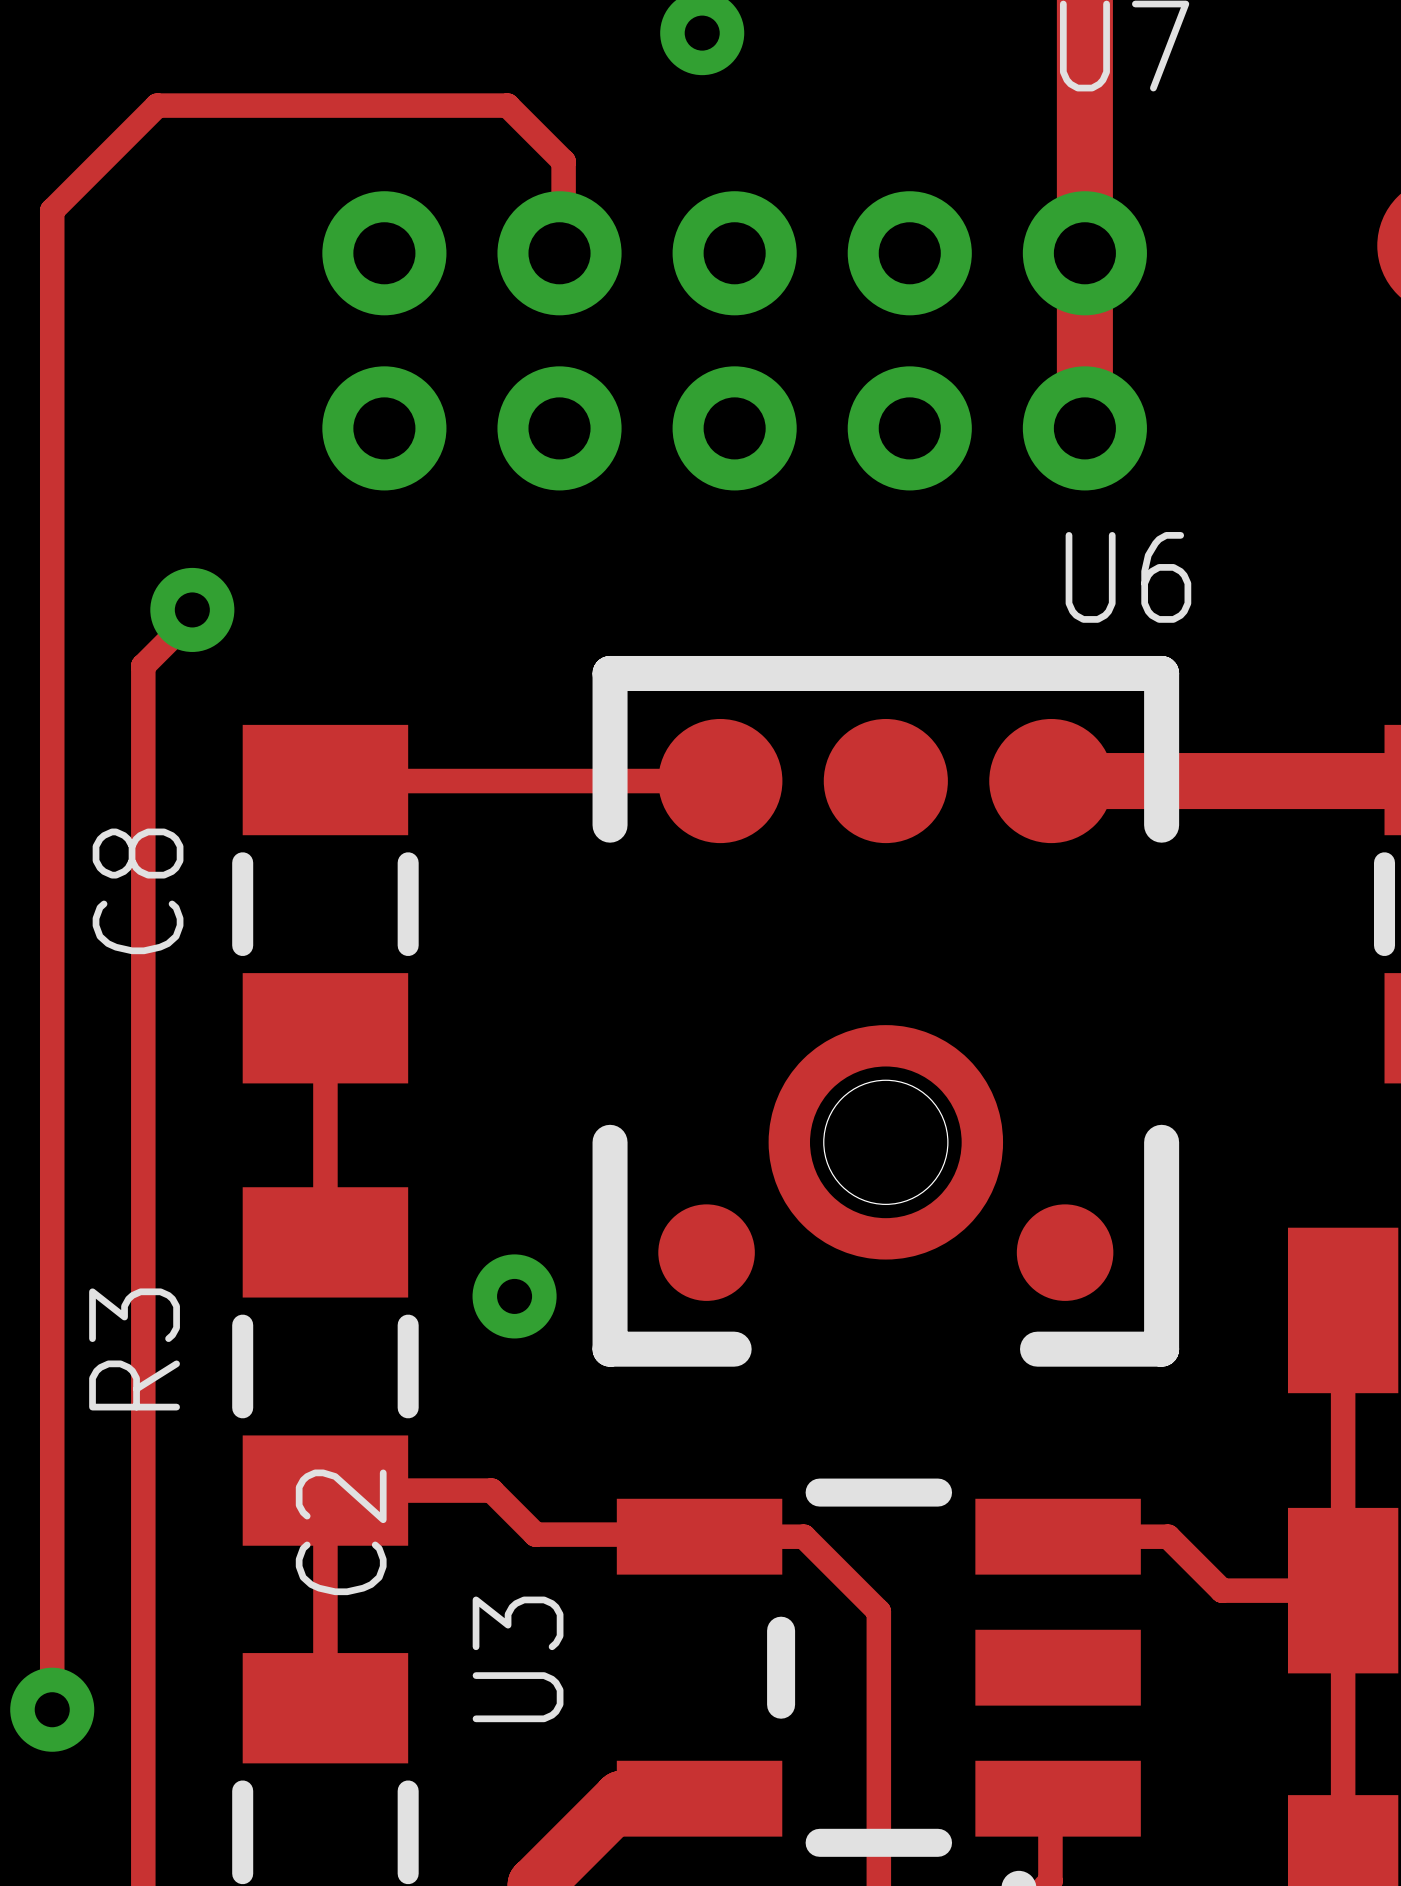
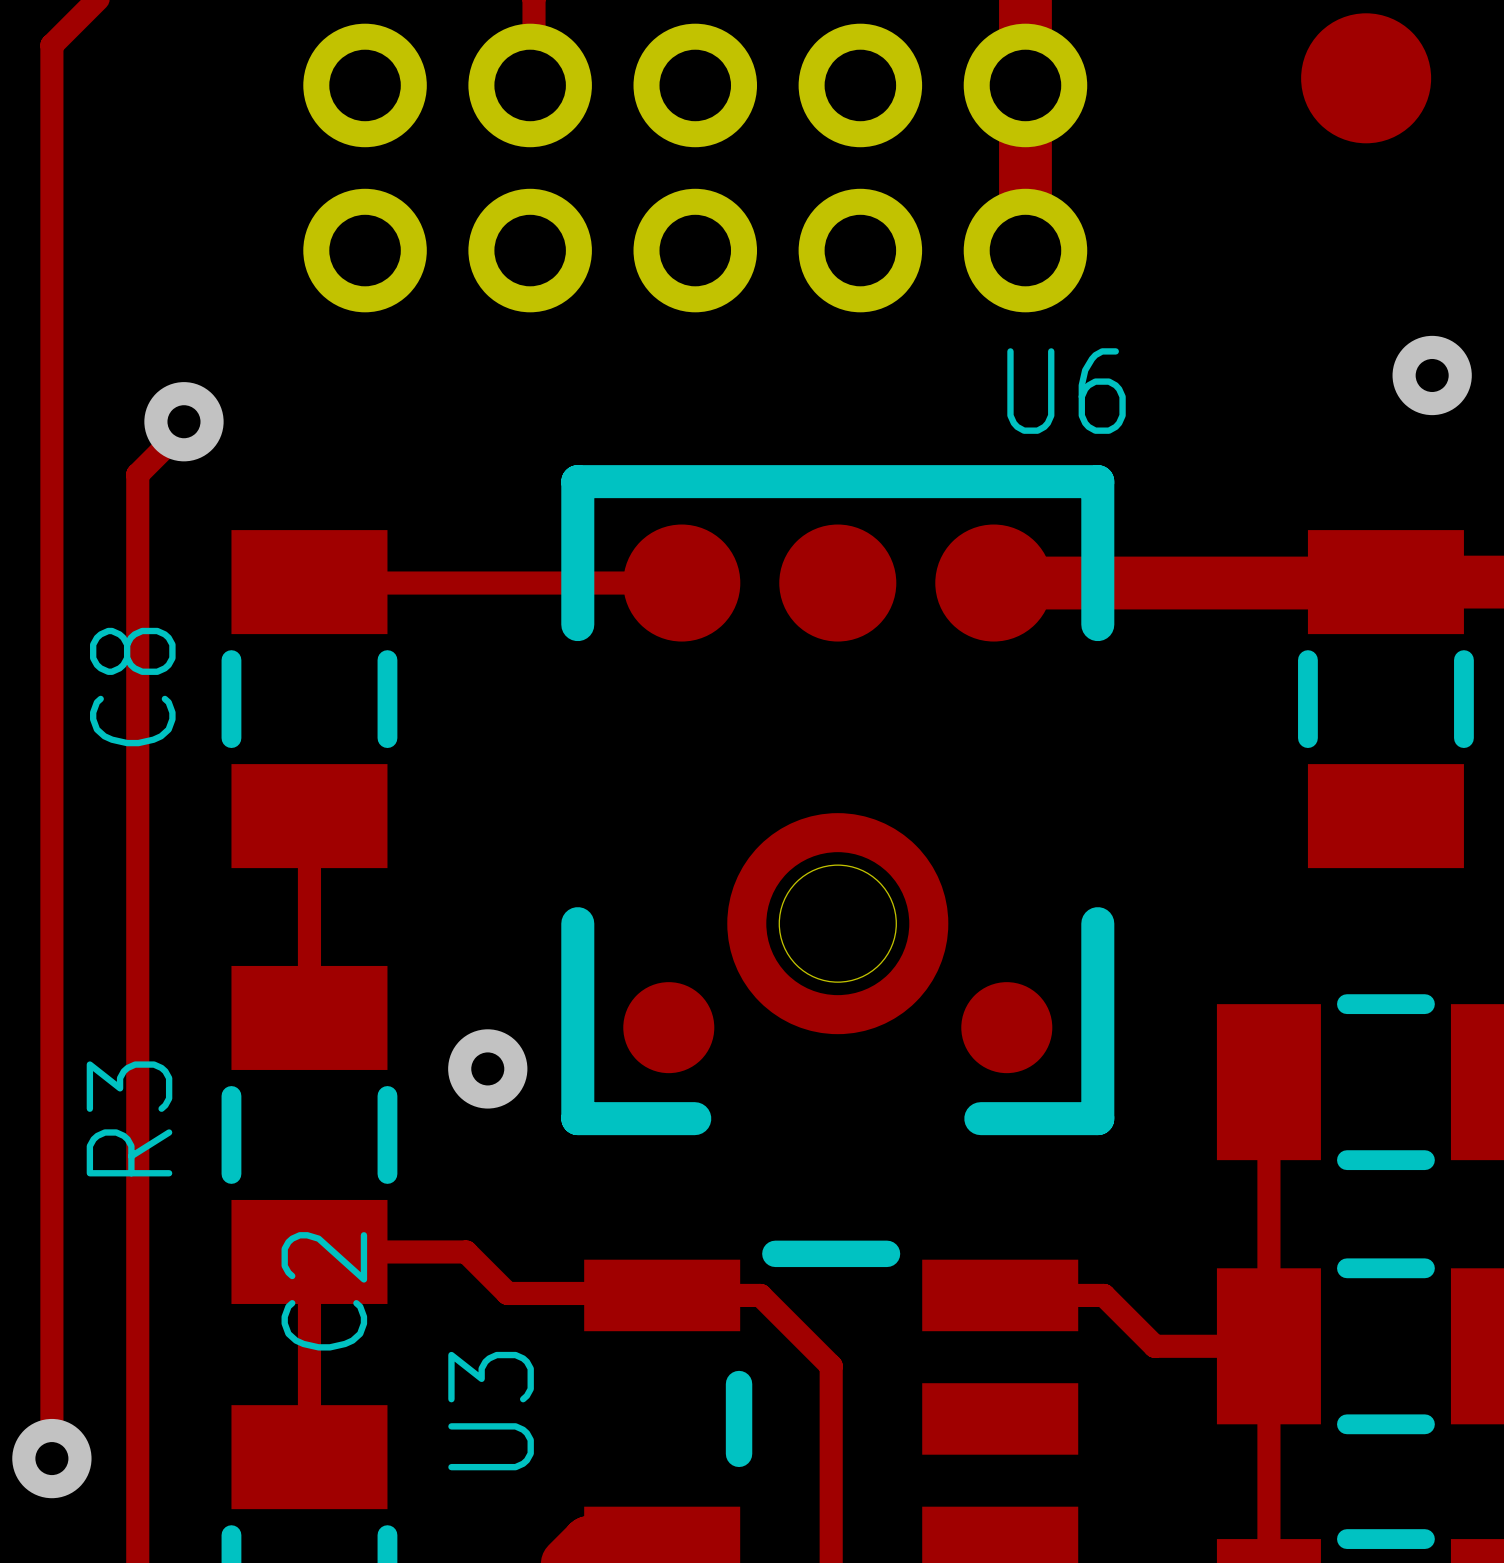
part footprint: [322, 191, 1147, 491] -> [303, 23, 1088, 313]

